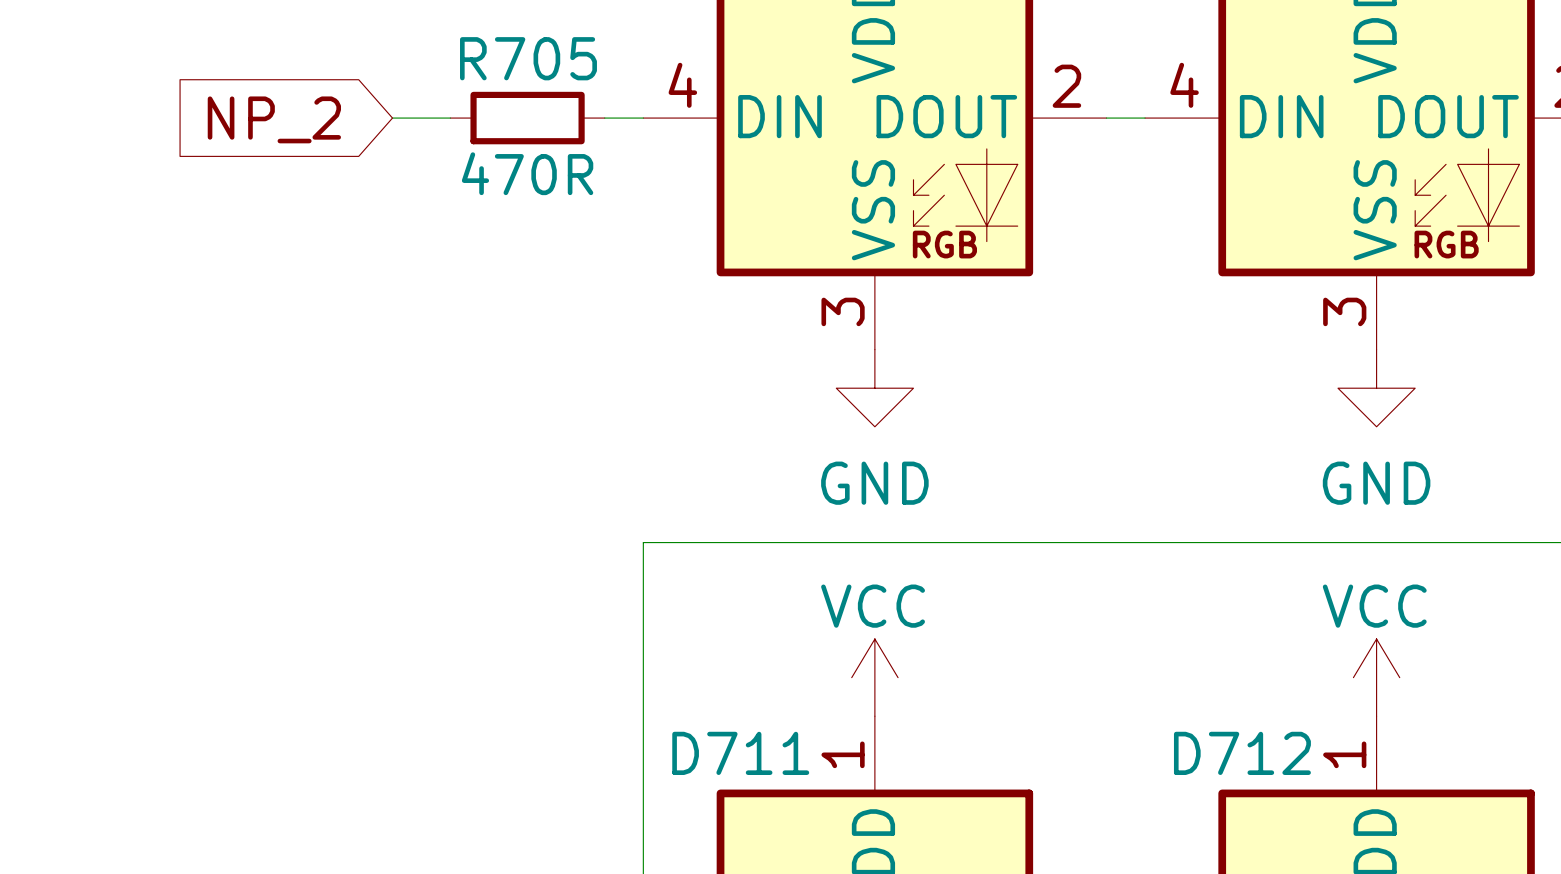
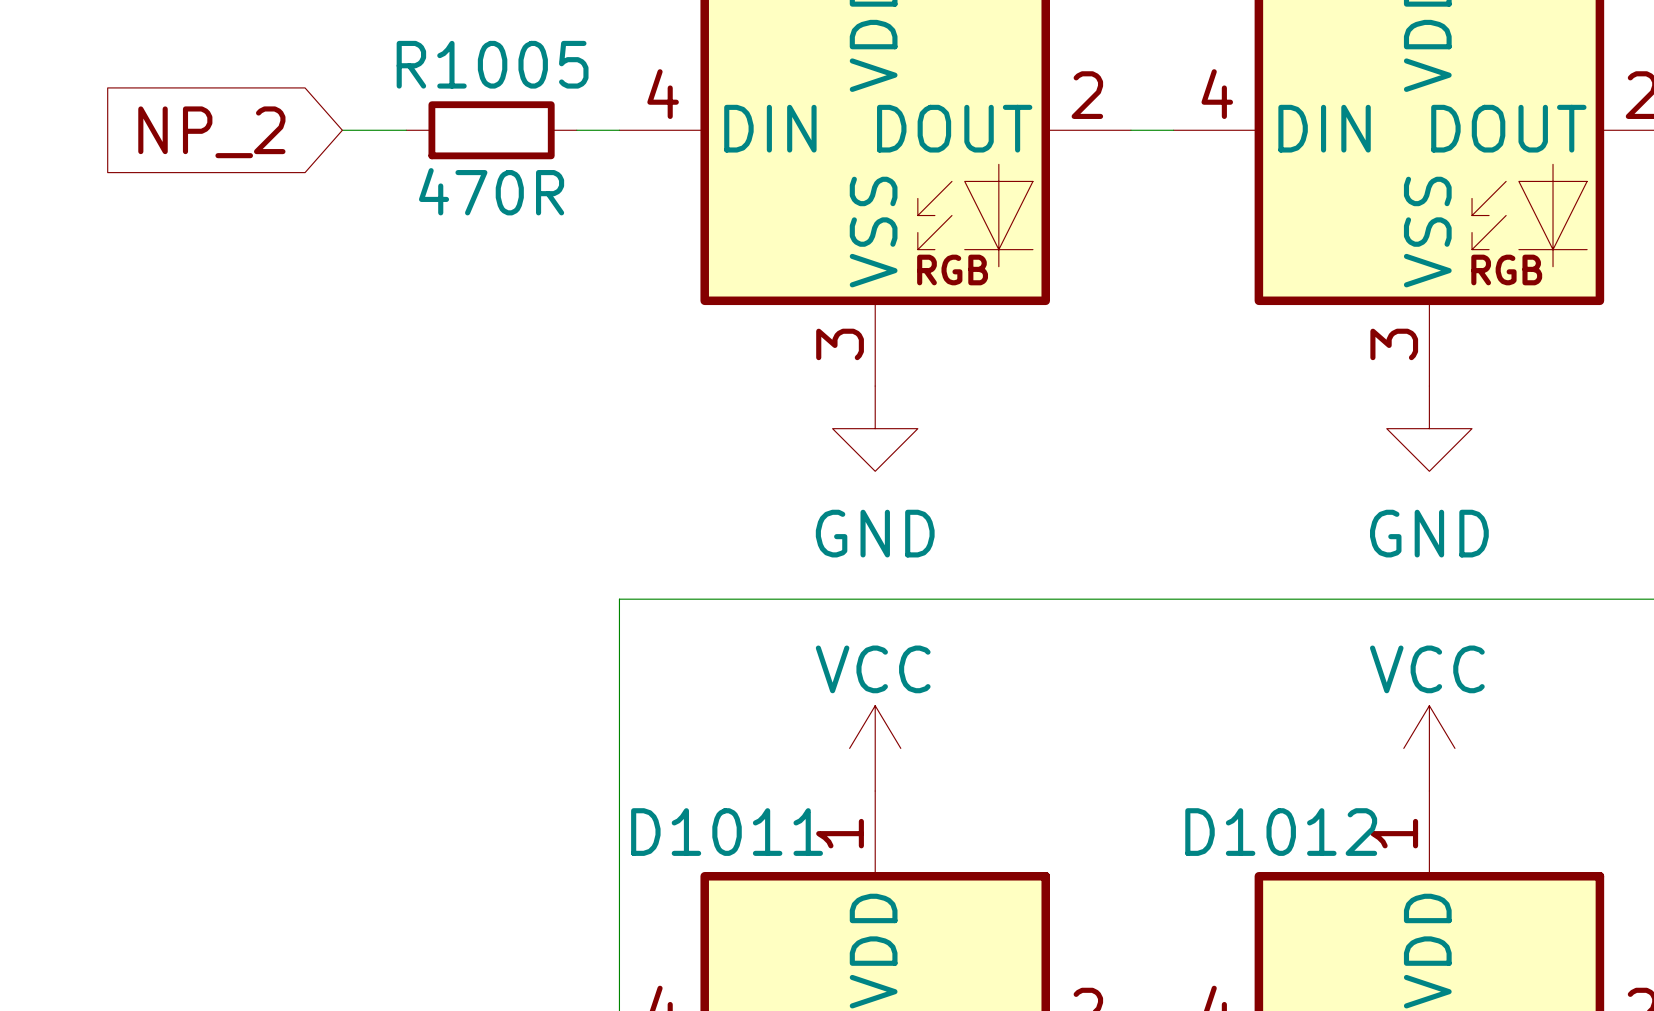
R705 name: R705 (528, 58) -> R1005 (492, 64)
D711 name: D711 (740, 753) -> D1011 (727, 832)
D712 name: D712 (1242, 753) -> D1012 (1281, 832)

